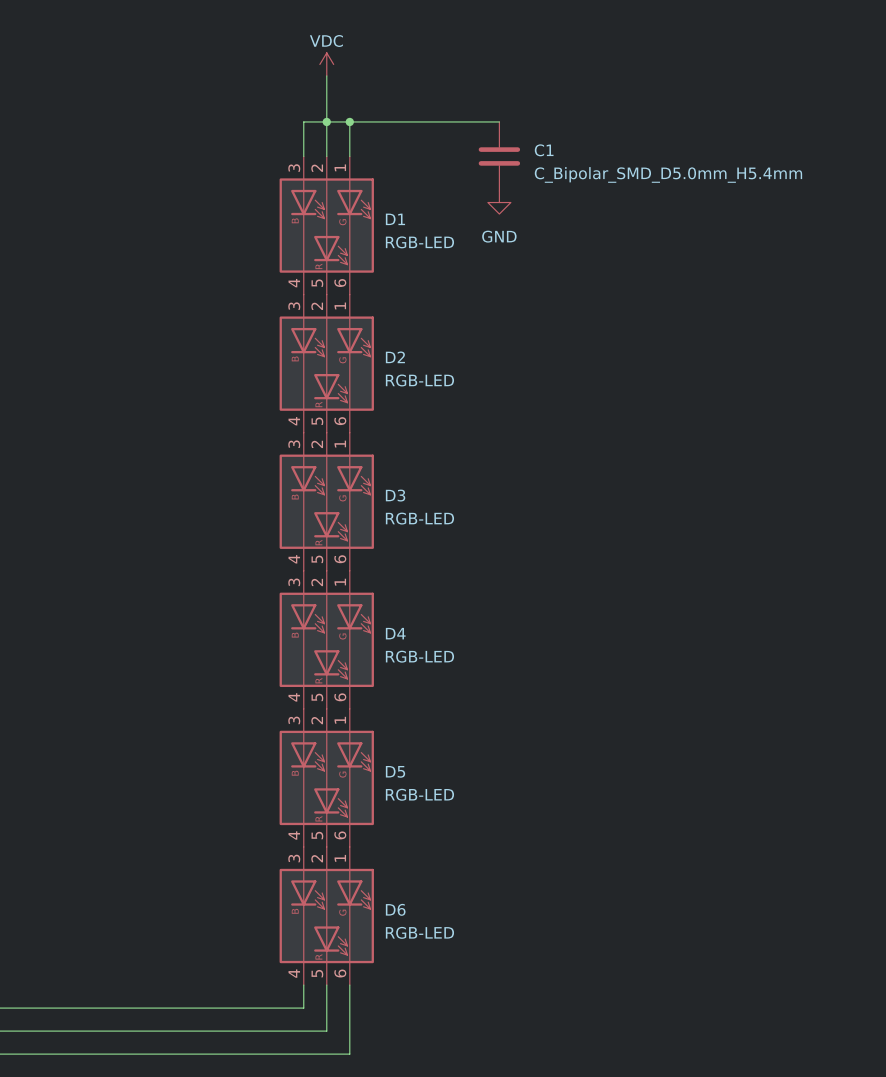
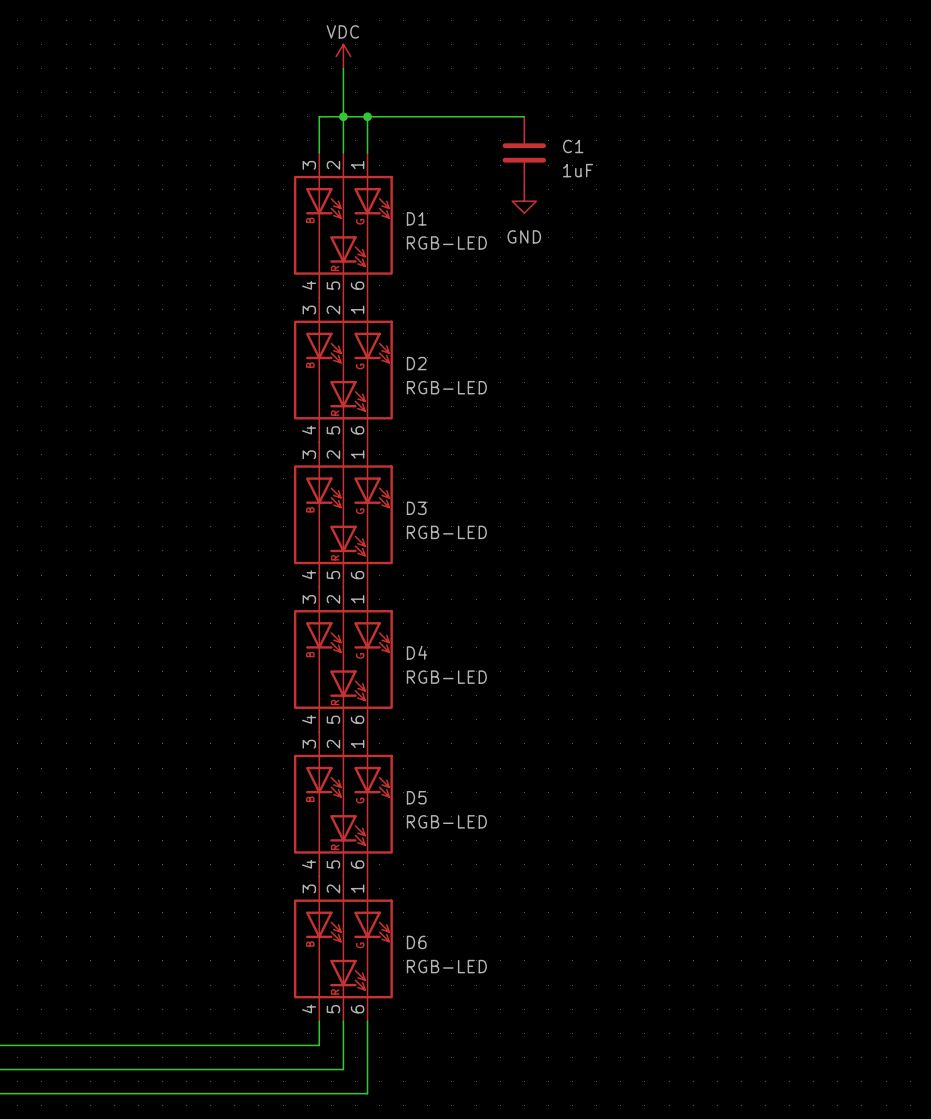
C1 value: C_Bipolar_SMD_D5.0mm_H5.4mm (668, 174) -> 1uF (578, 170)

